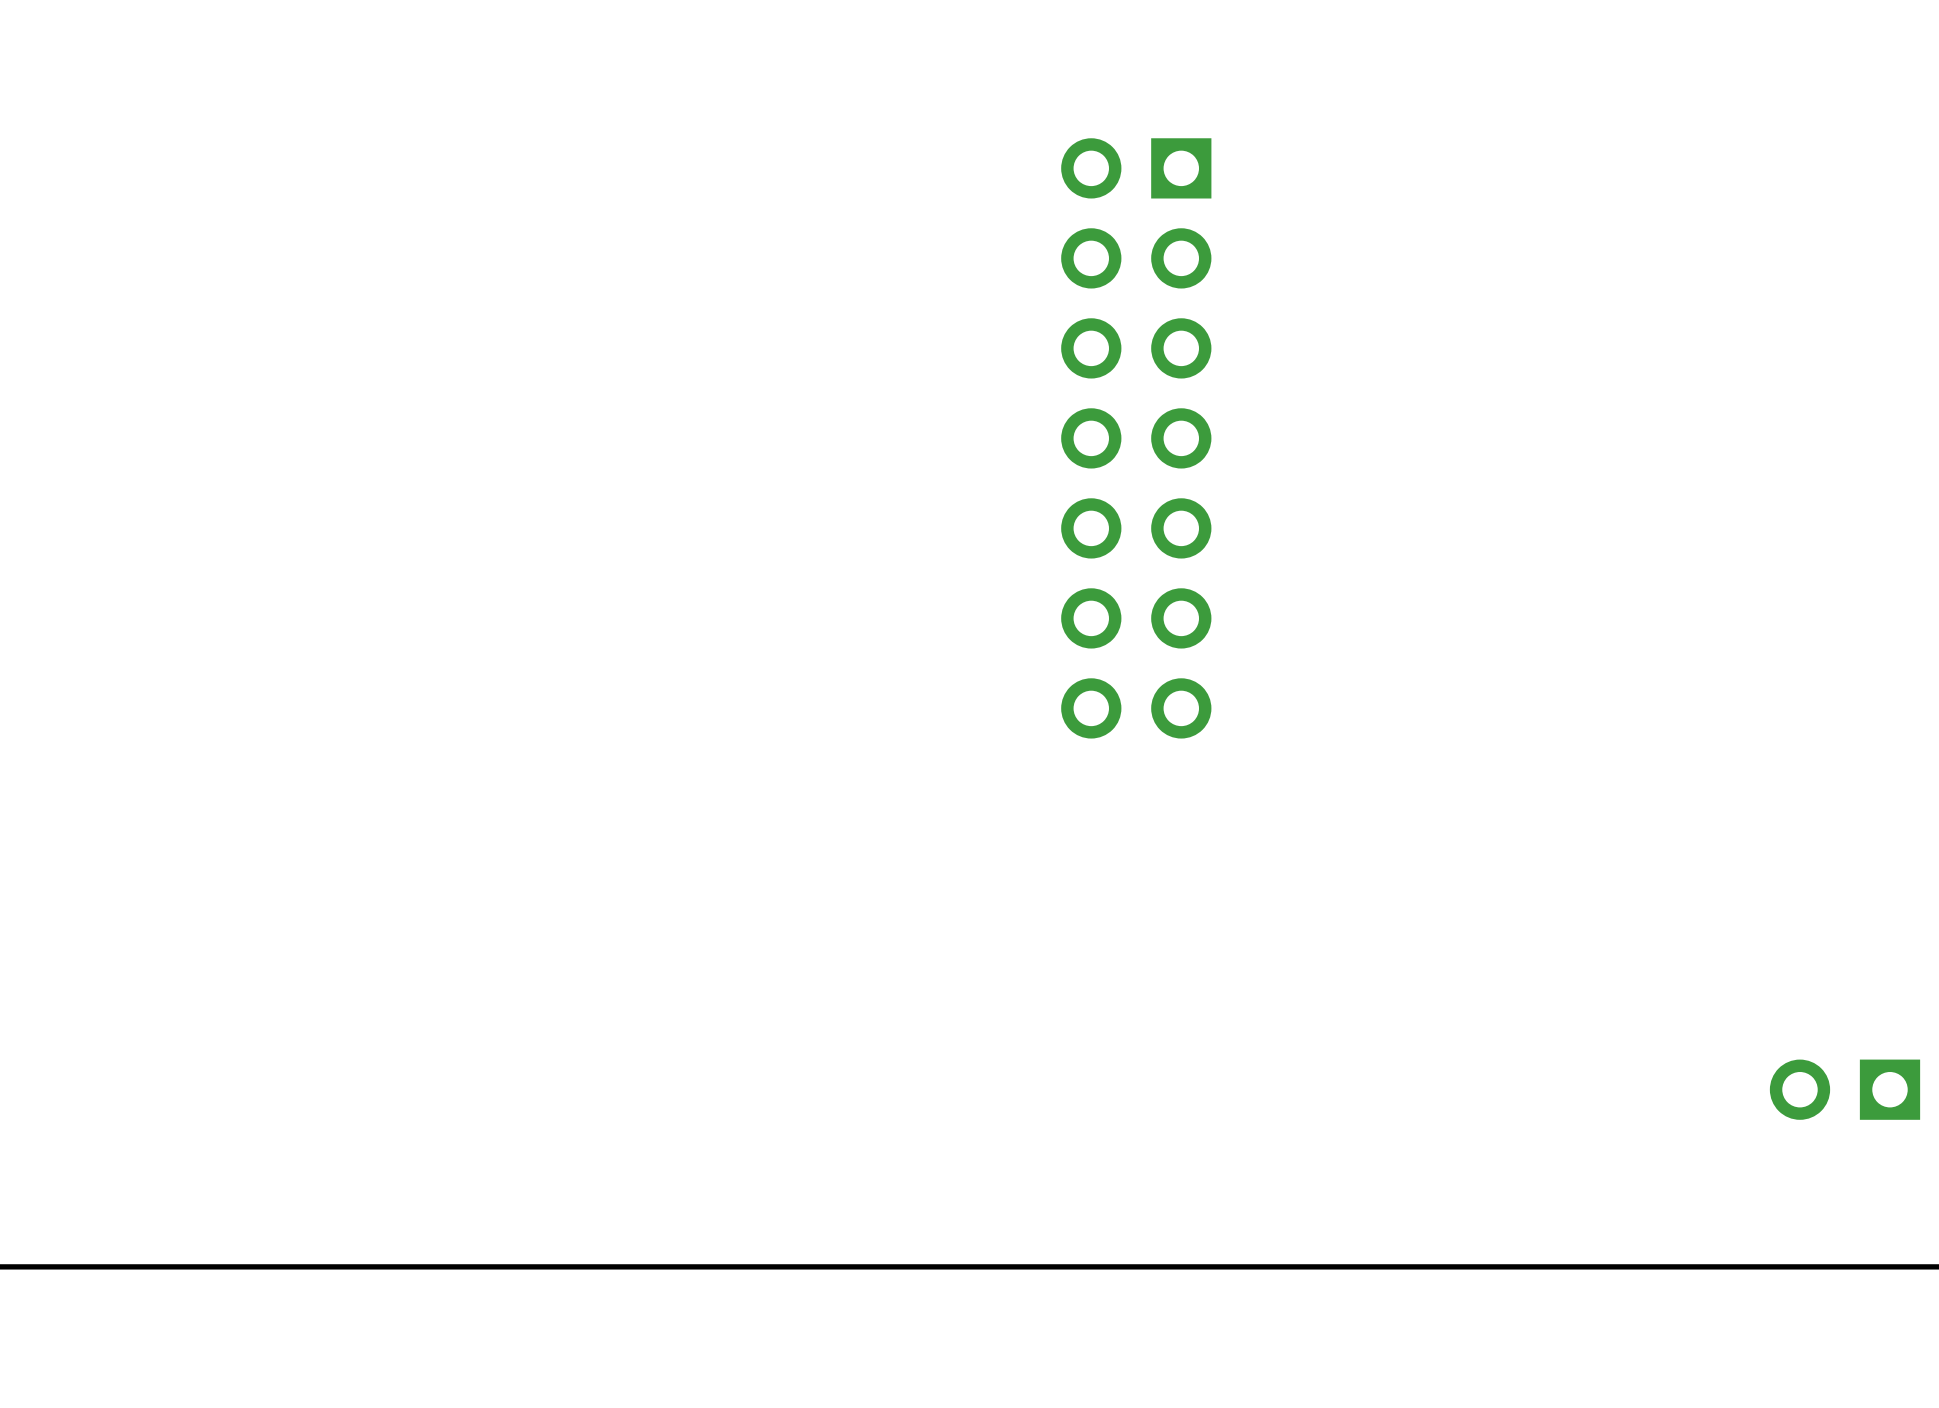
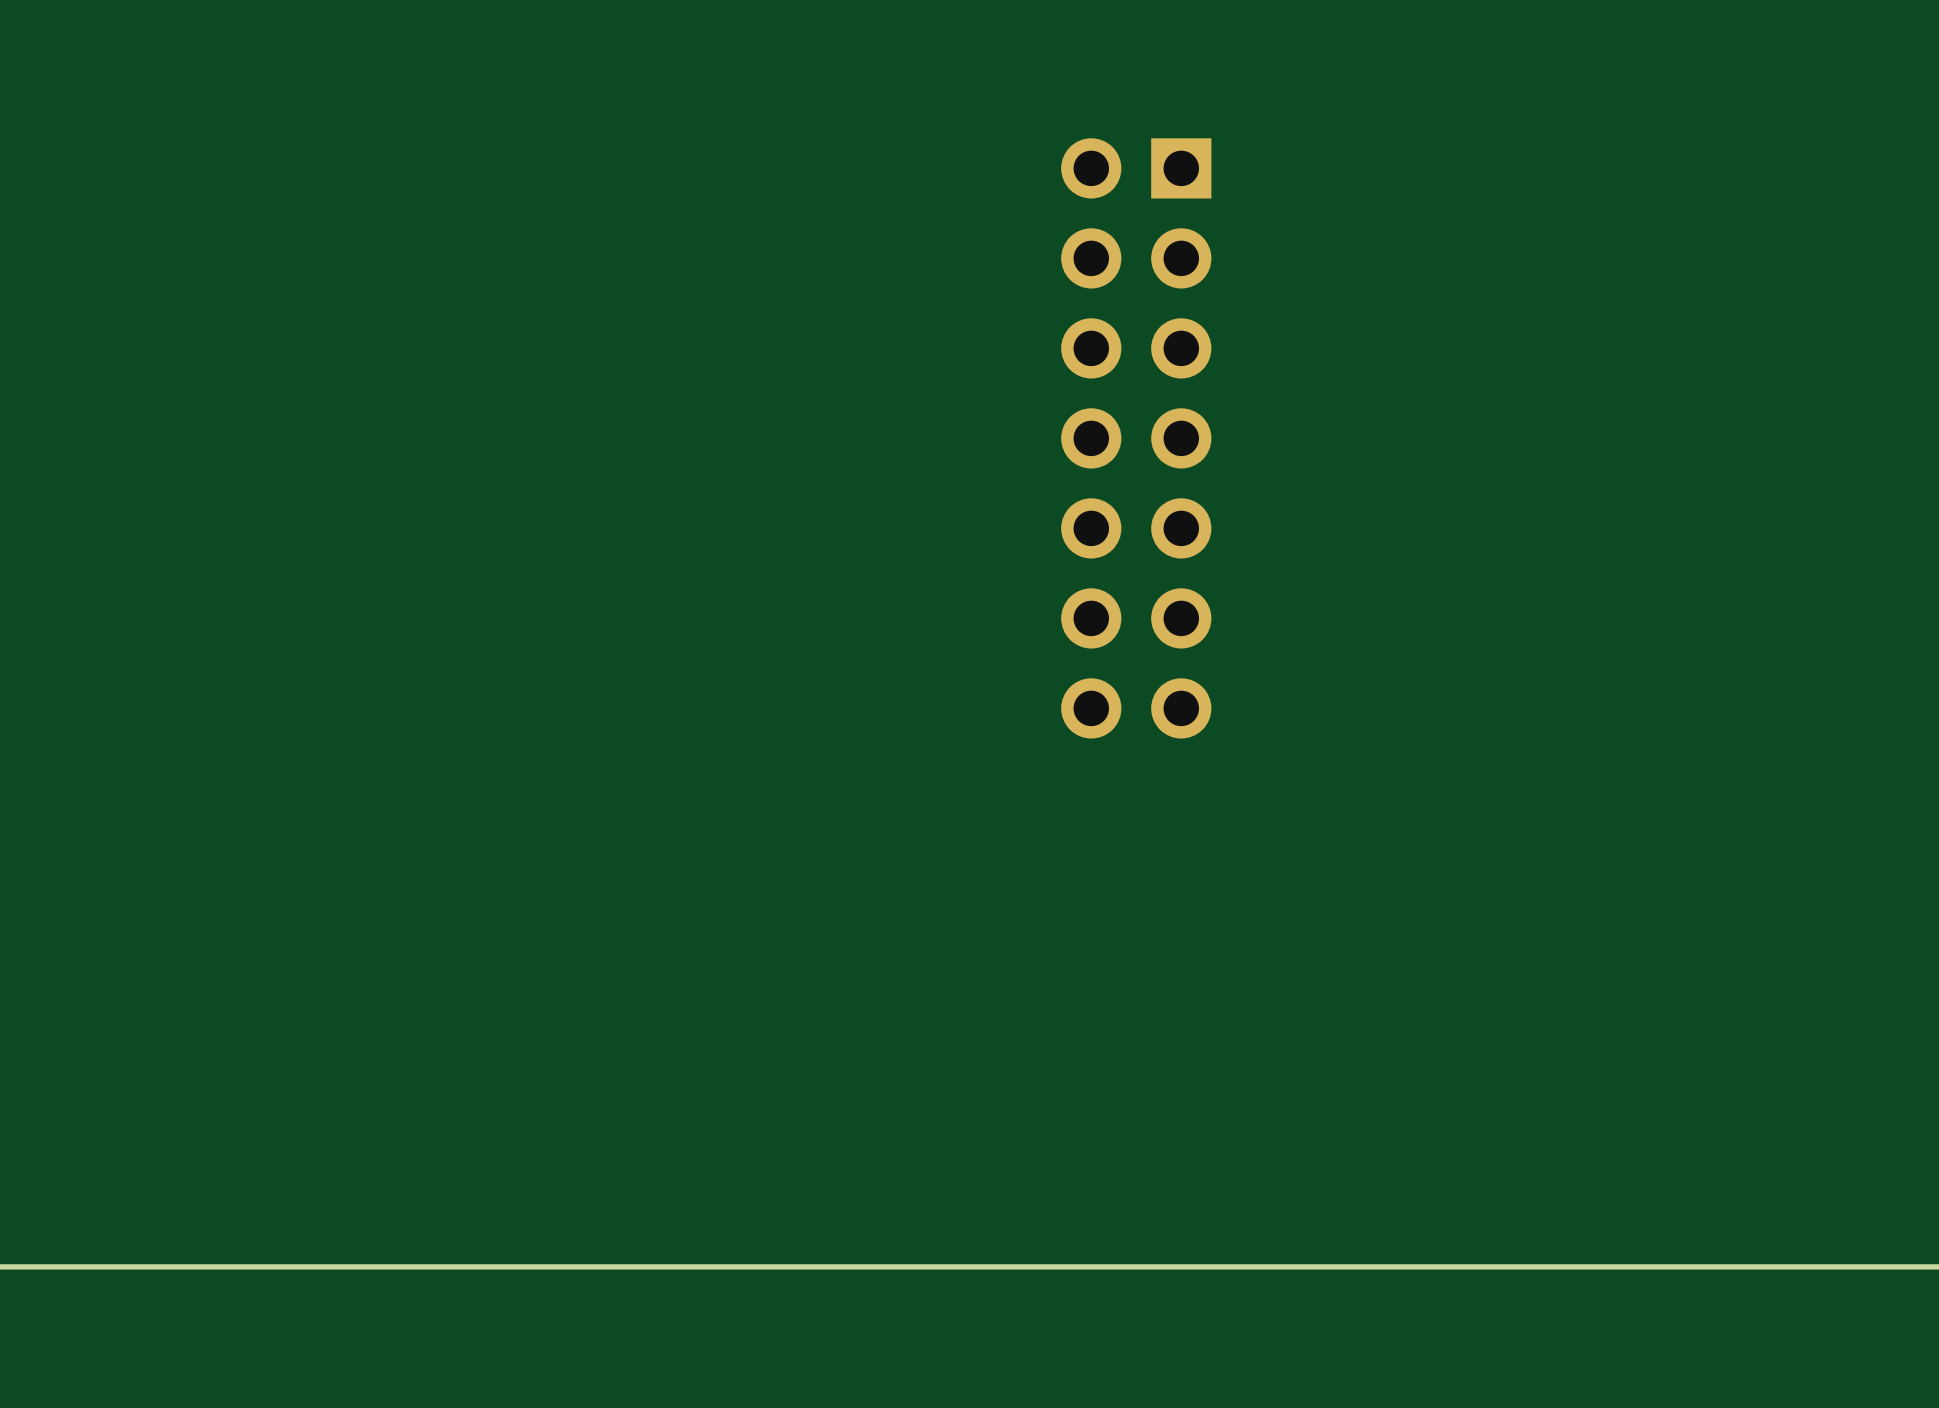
part: (1845, 1089) -> none

